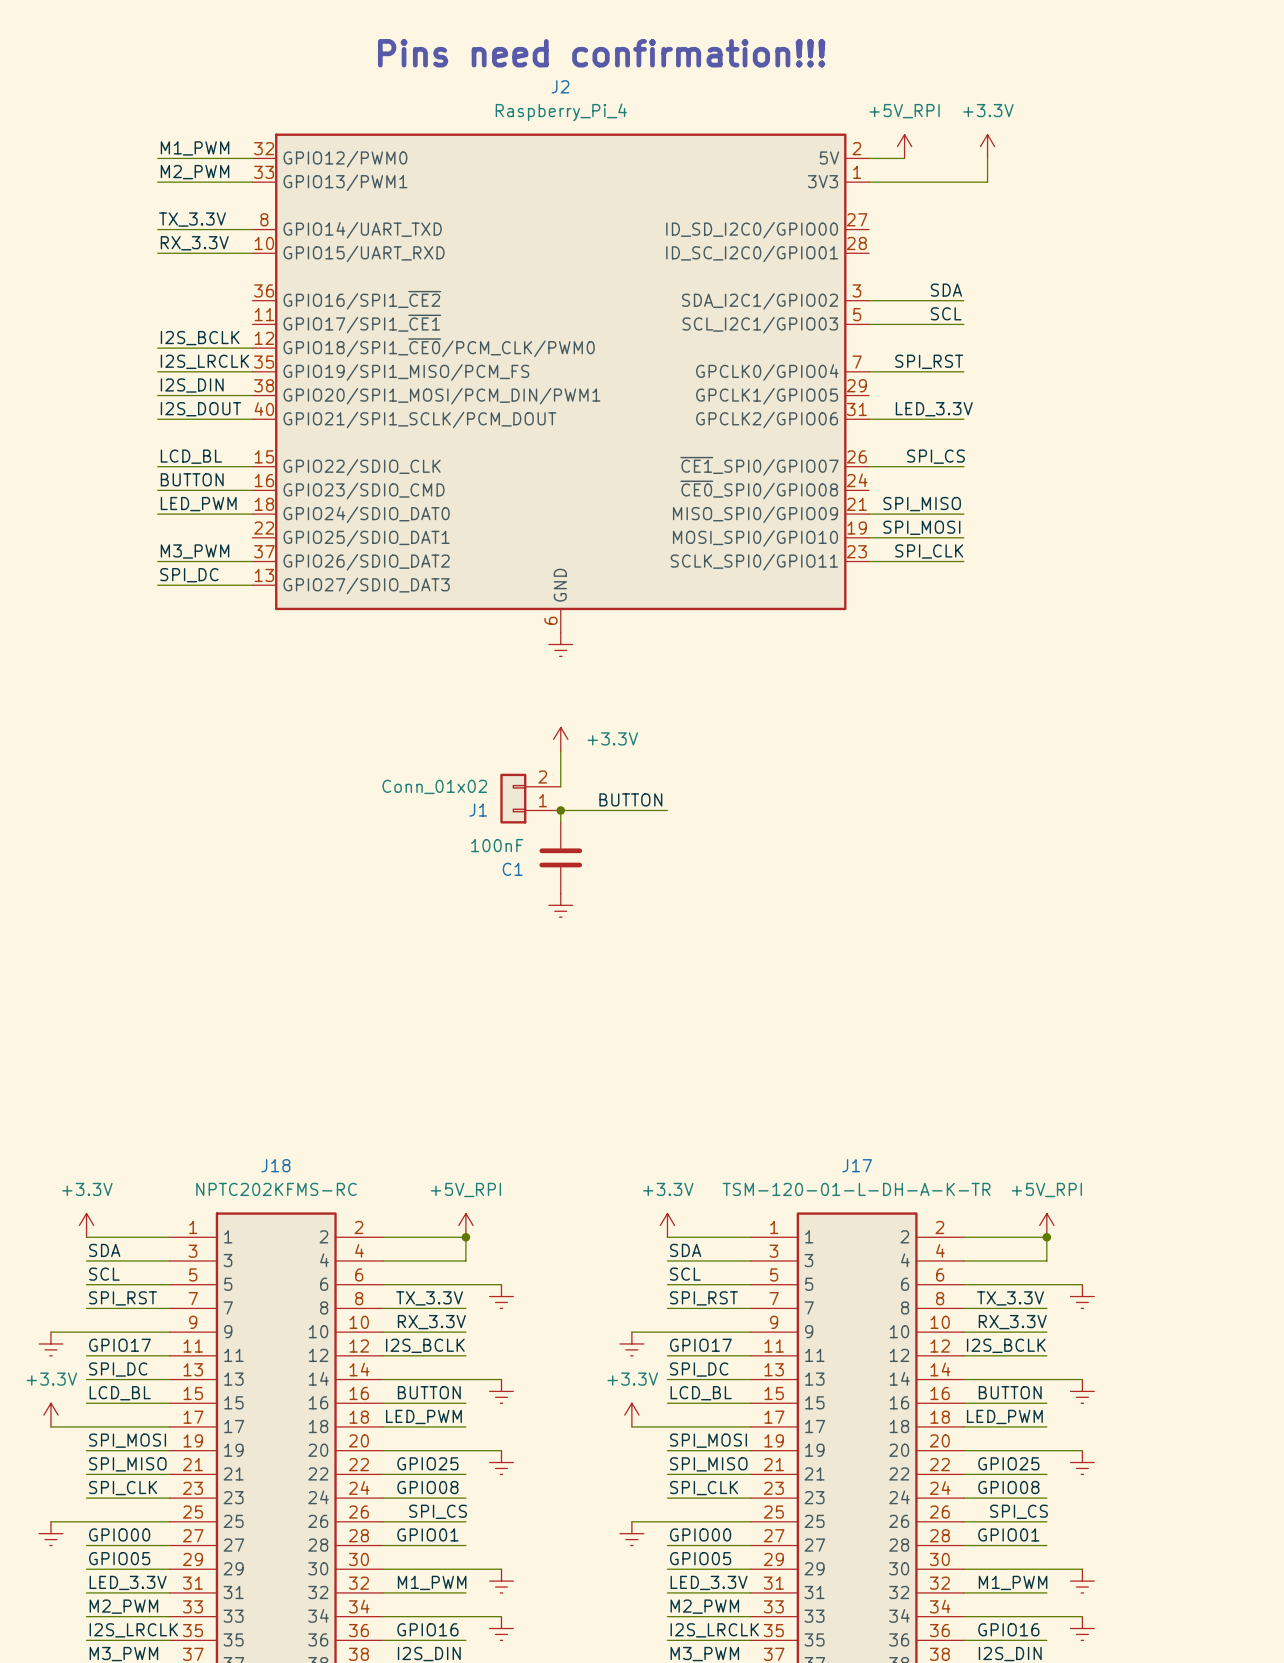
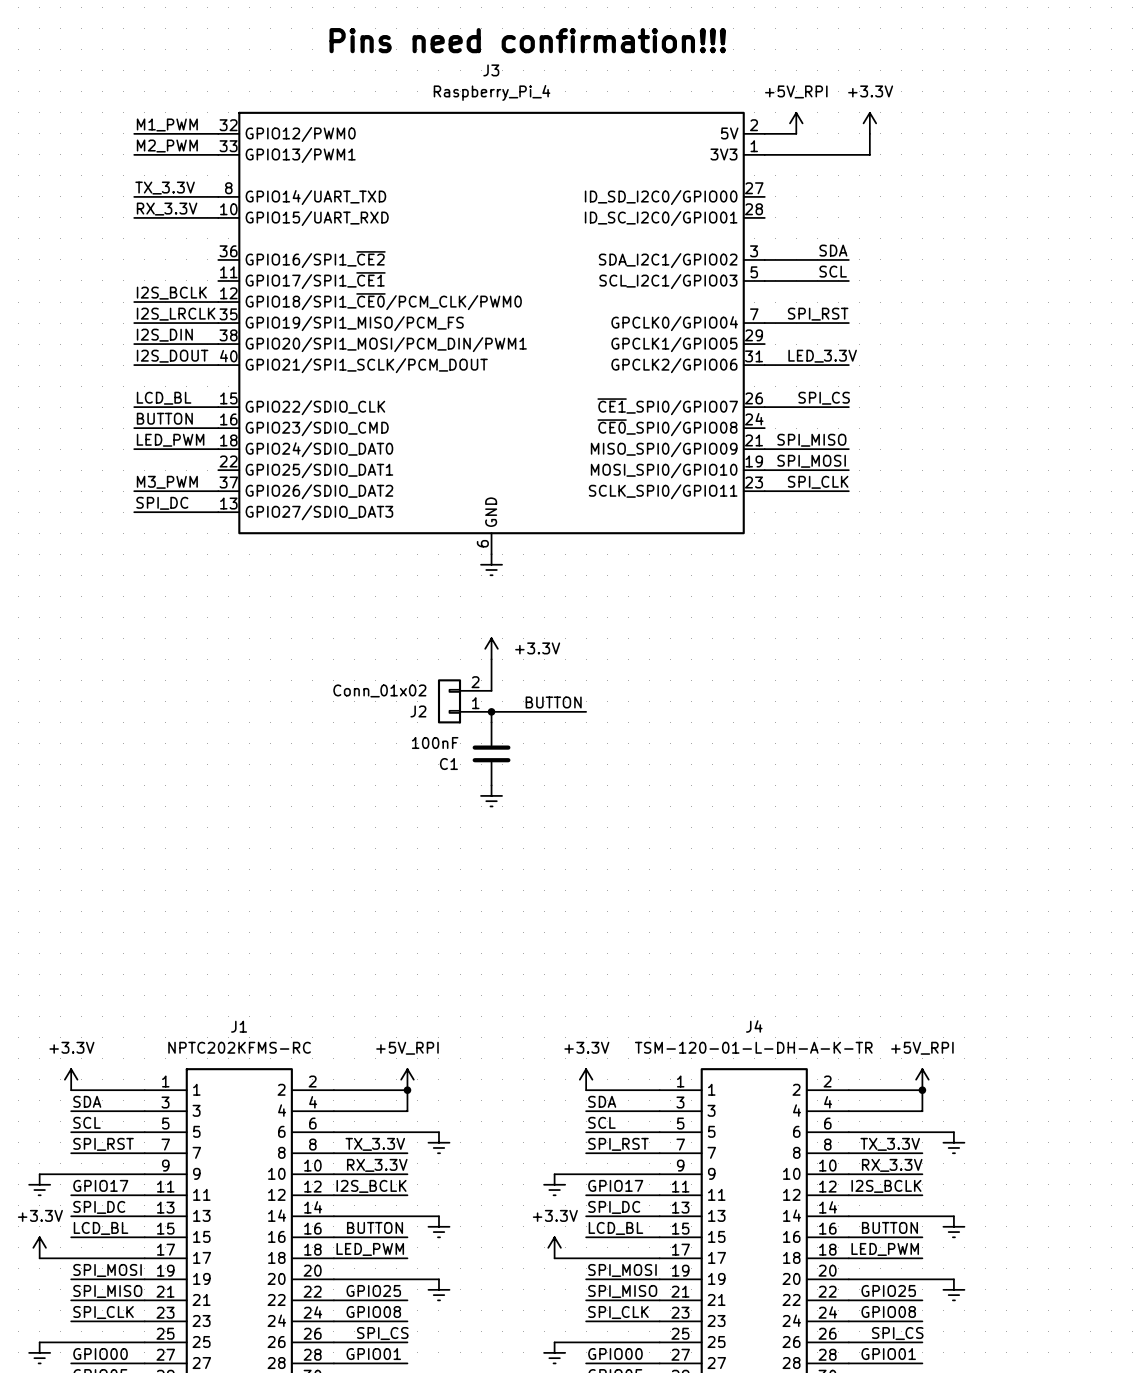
J2 name: J2 (560, 86) -> J3 (491, 70)
J1 name: J1 (478, 810) -> J2 (418, 711)
J18 name: J18 (275, 1165) -> J1 (239, 1026)
J17 name: J17 (857, 1165) -> J4 (754, 1026)

